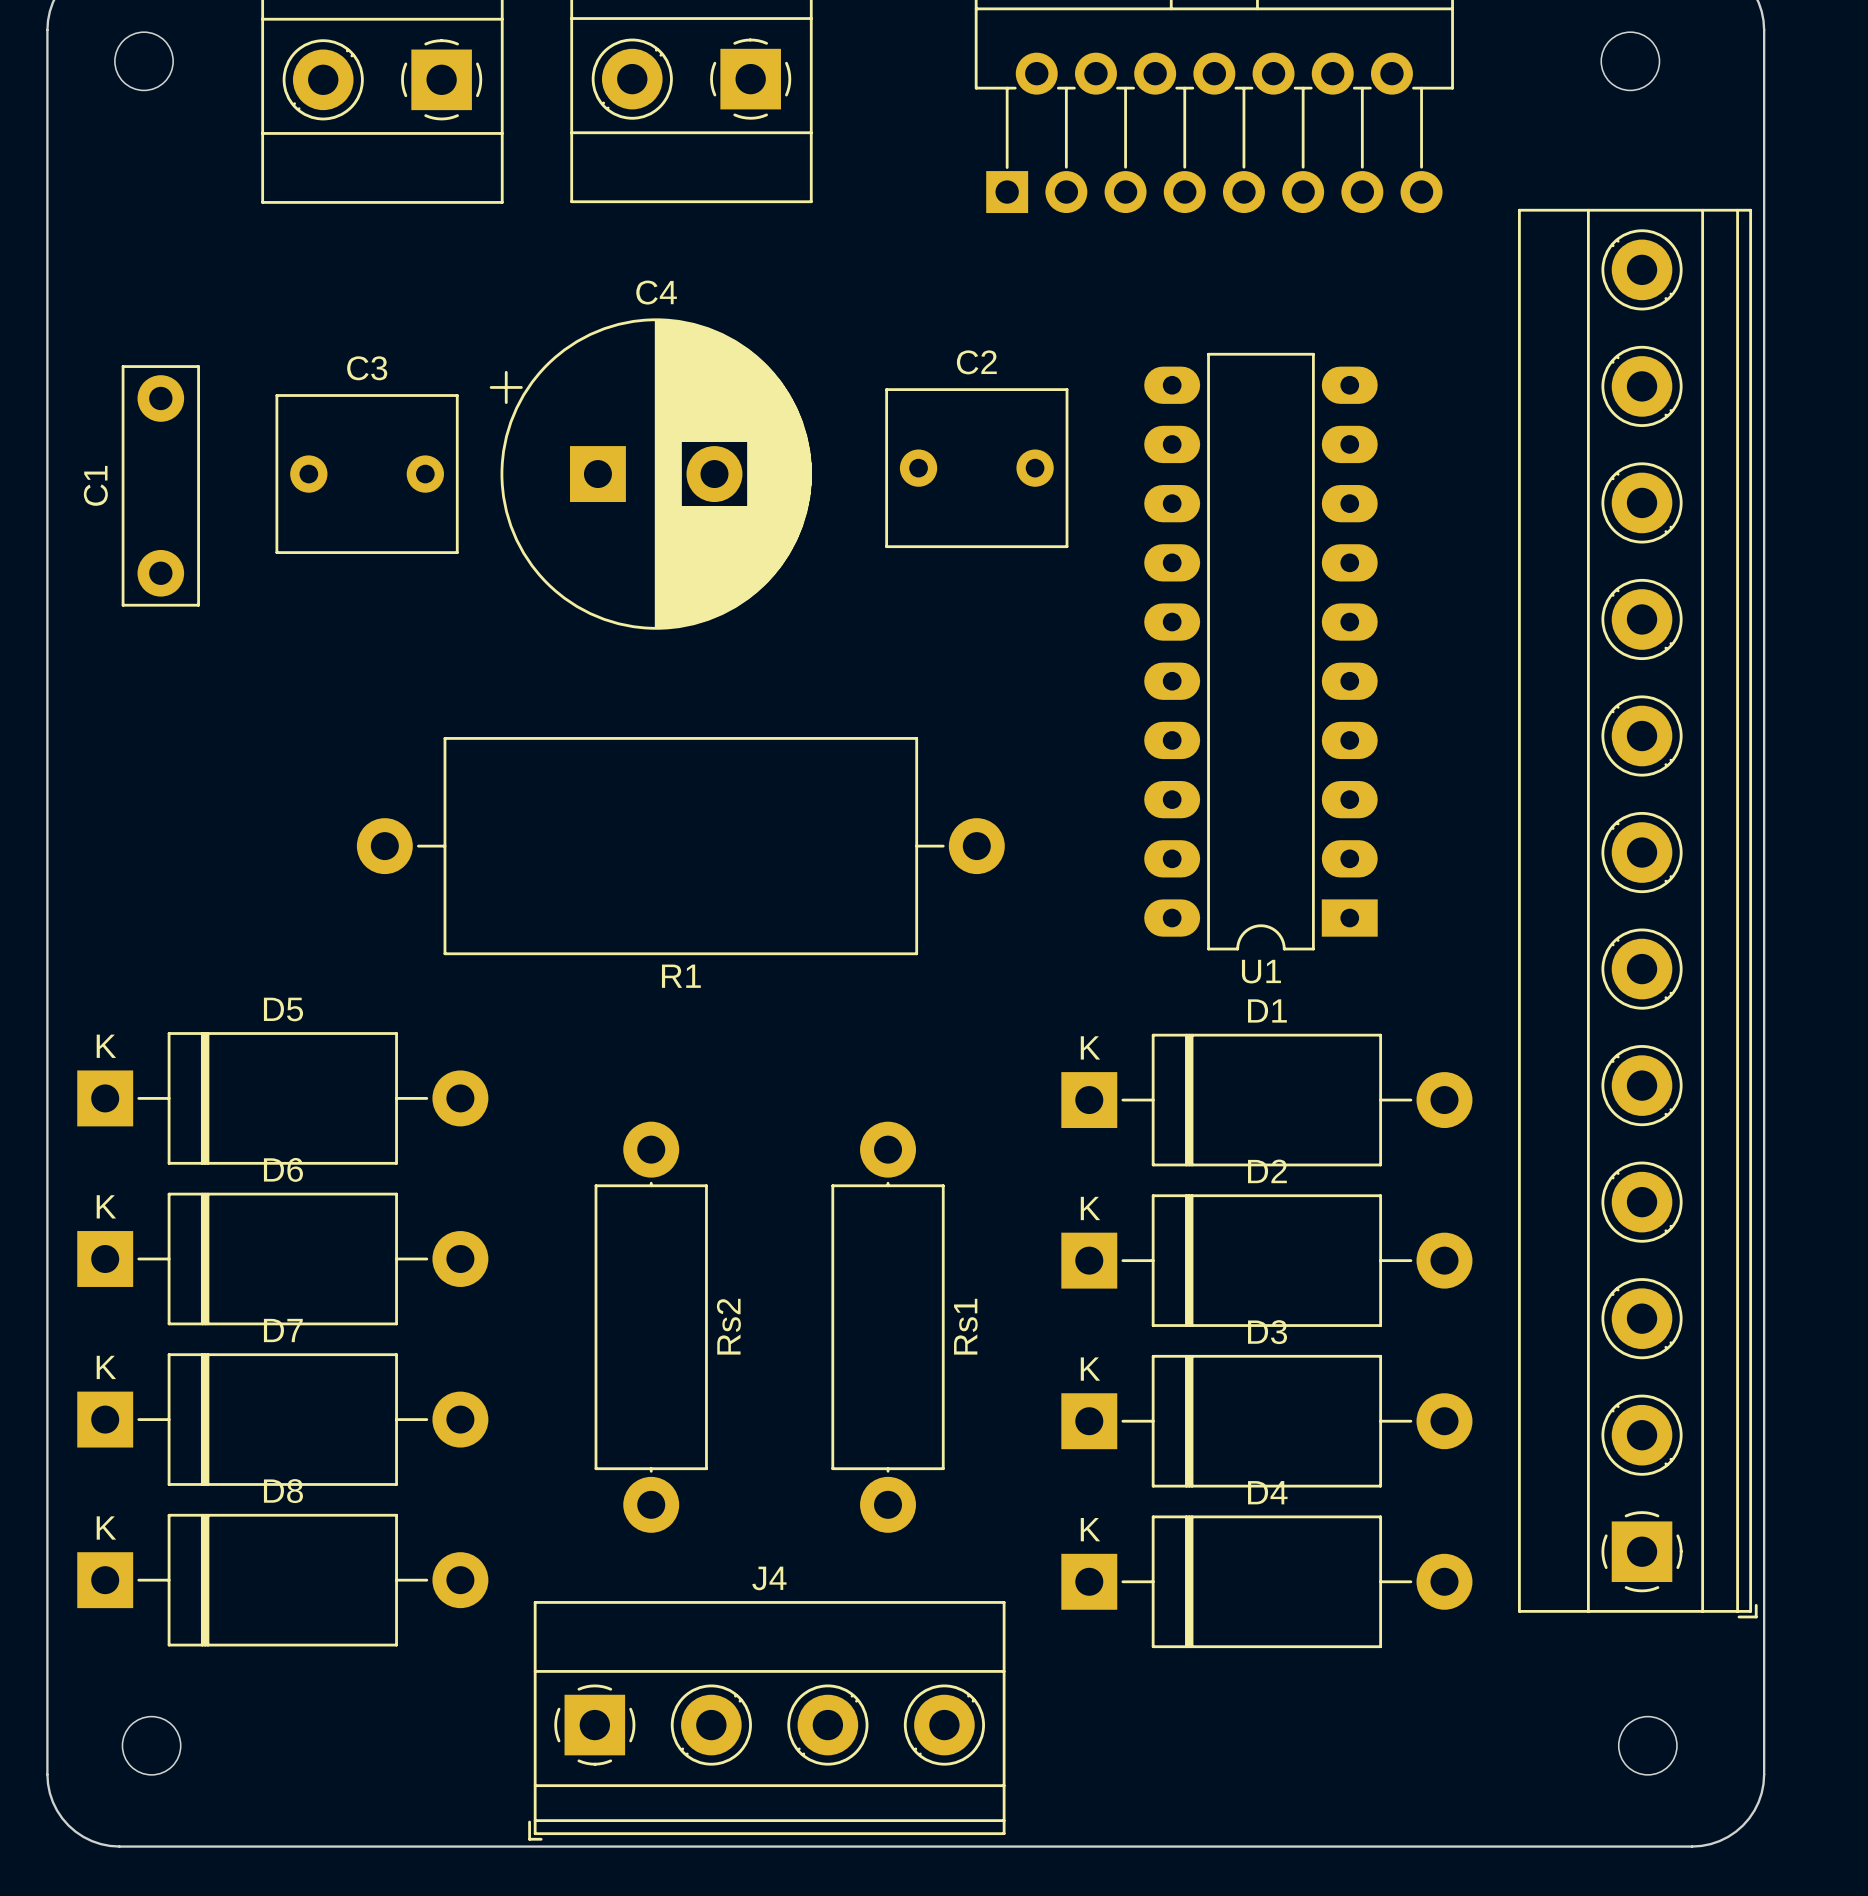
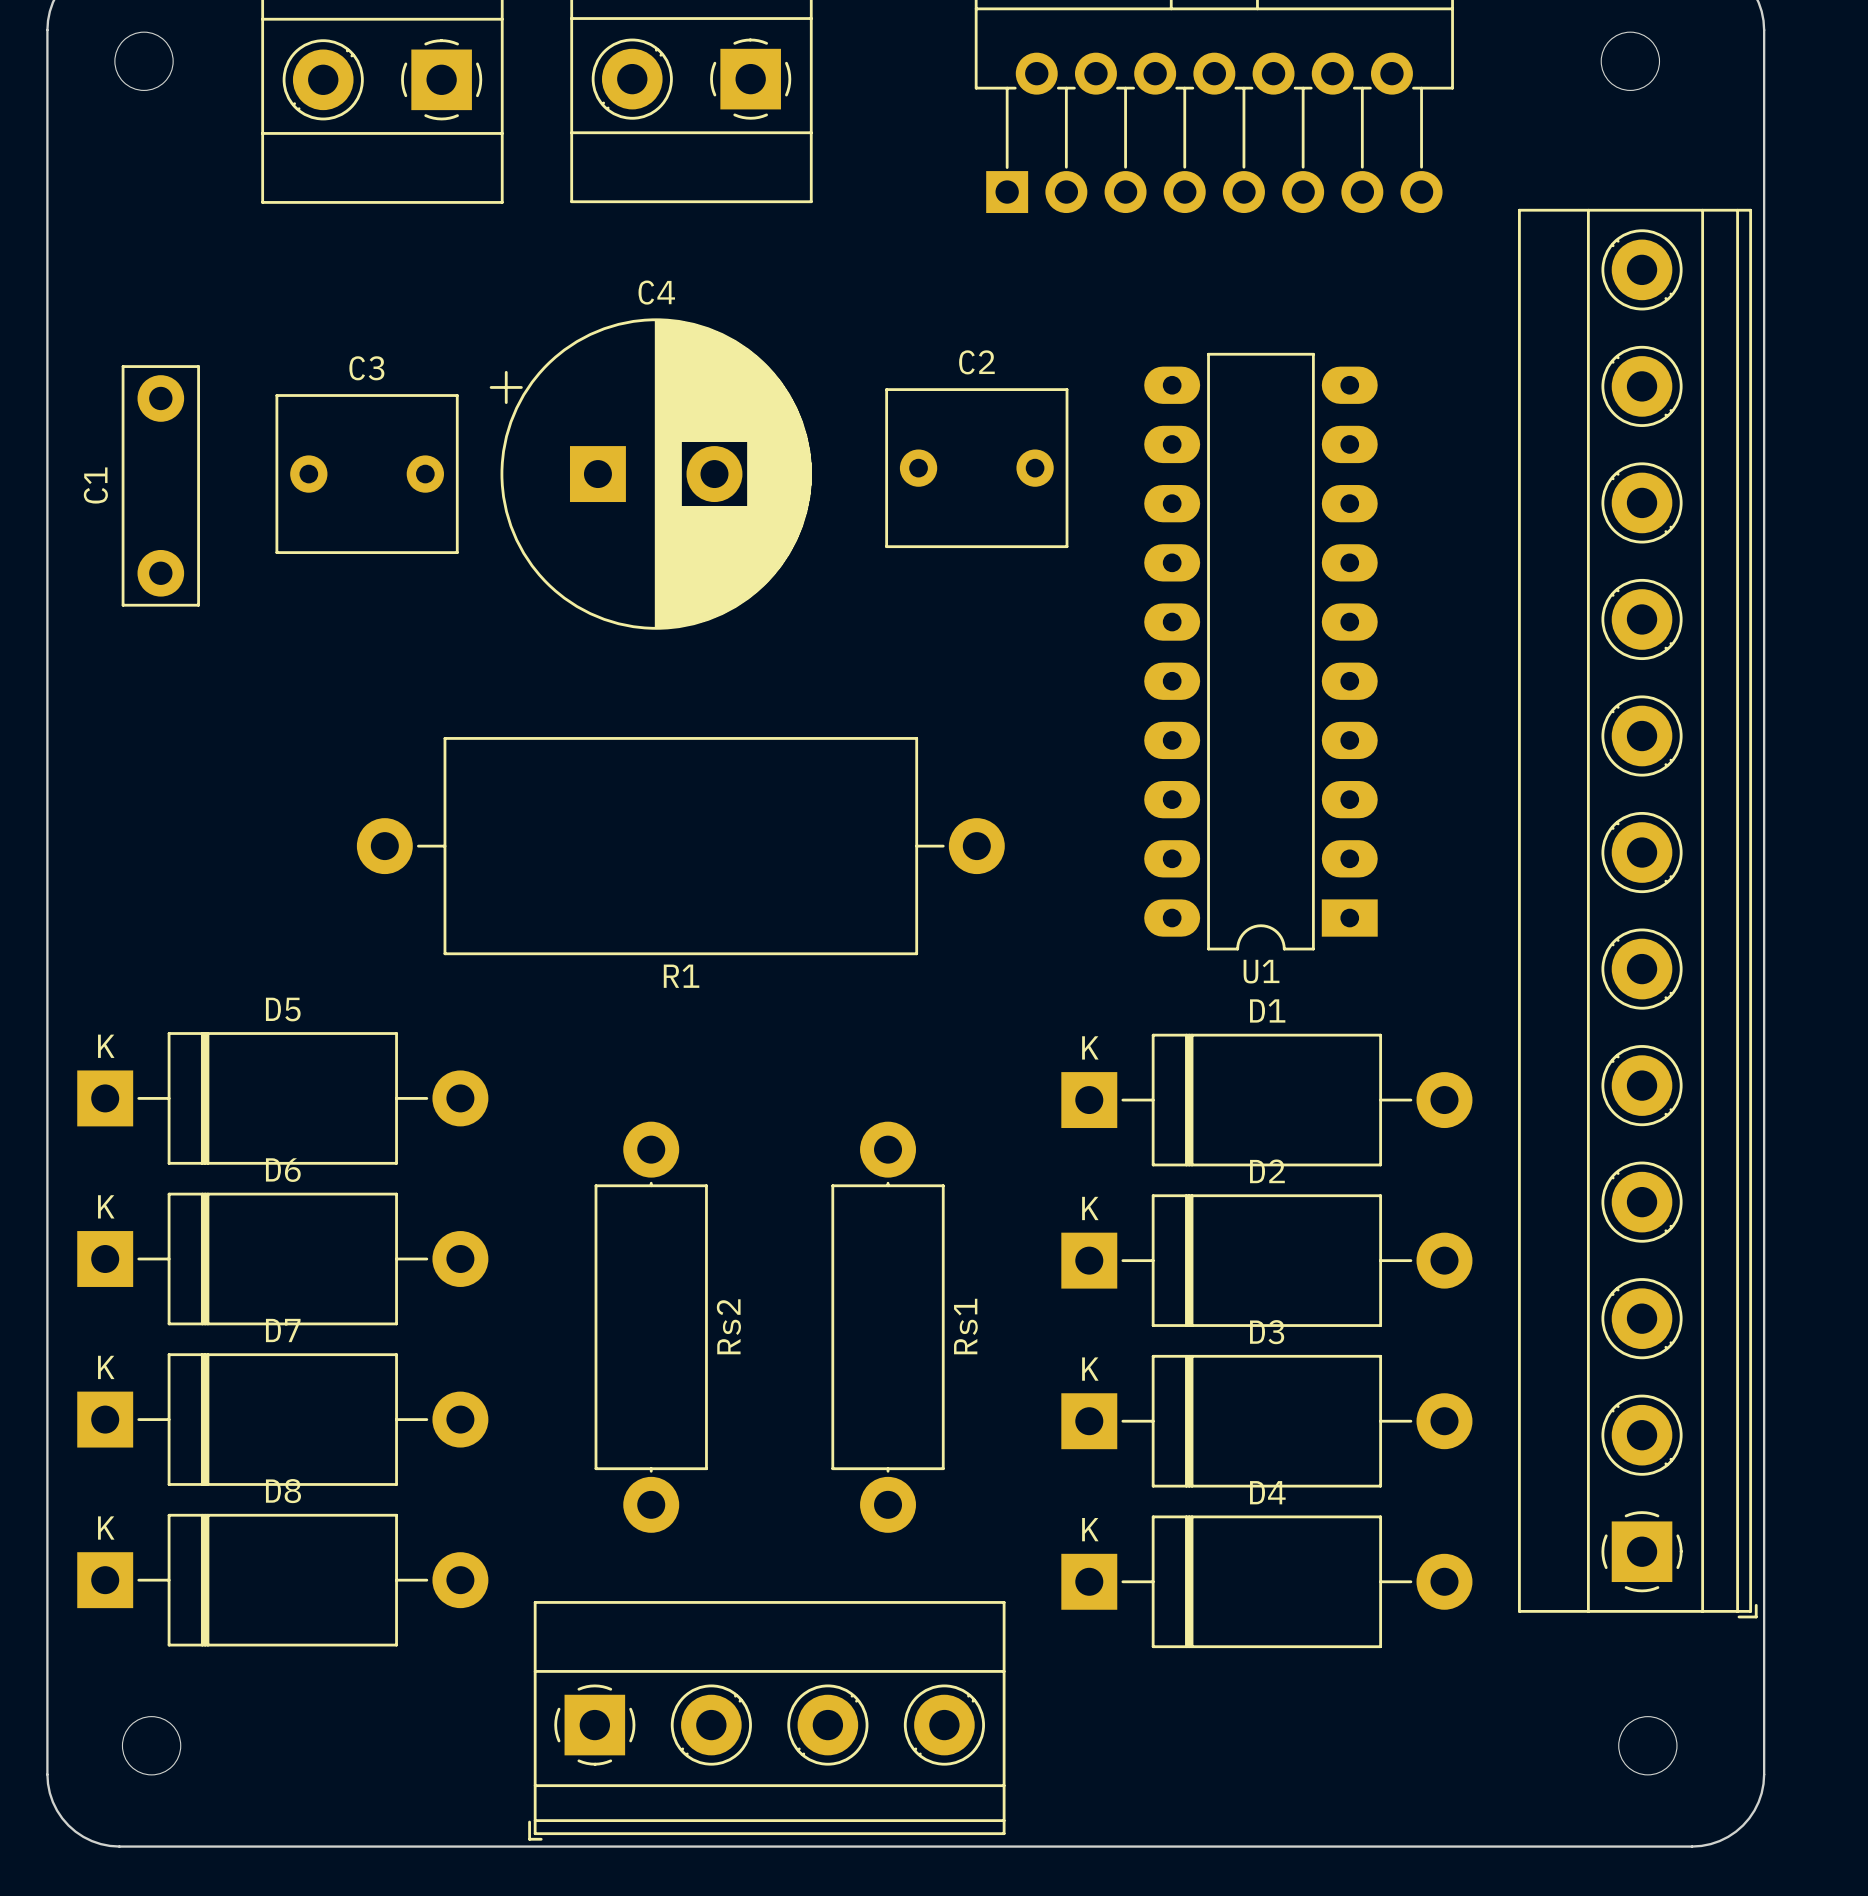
J4 name: J4 (769, 1578) -> none

